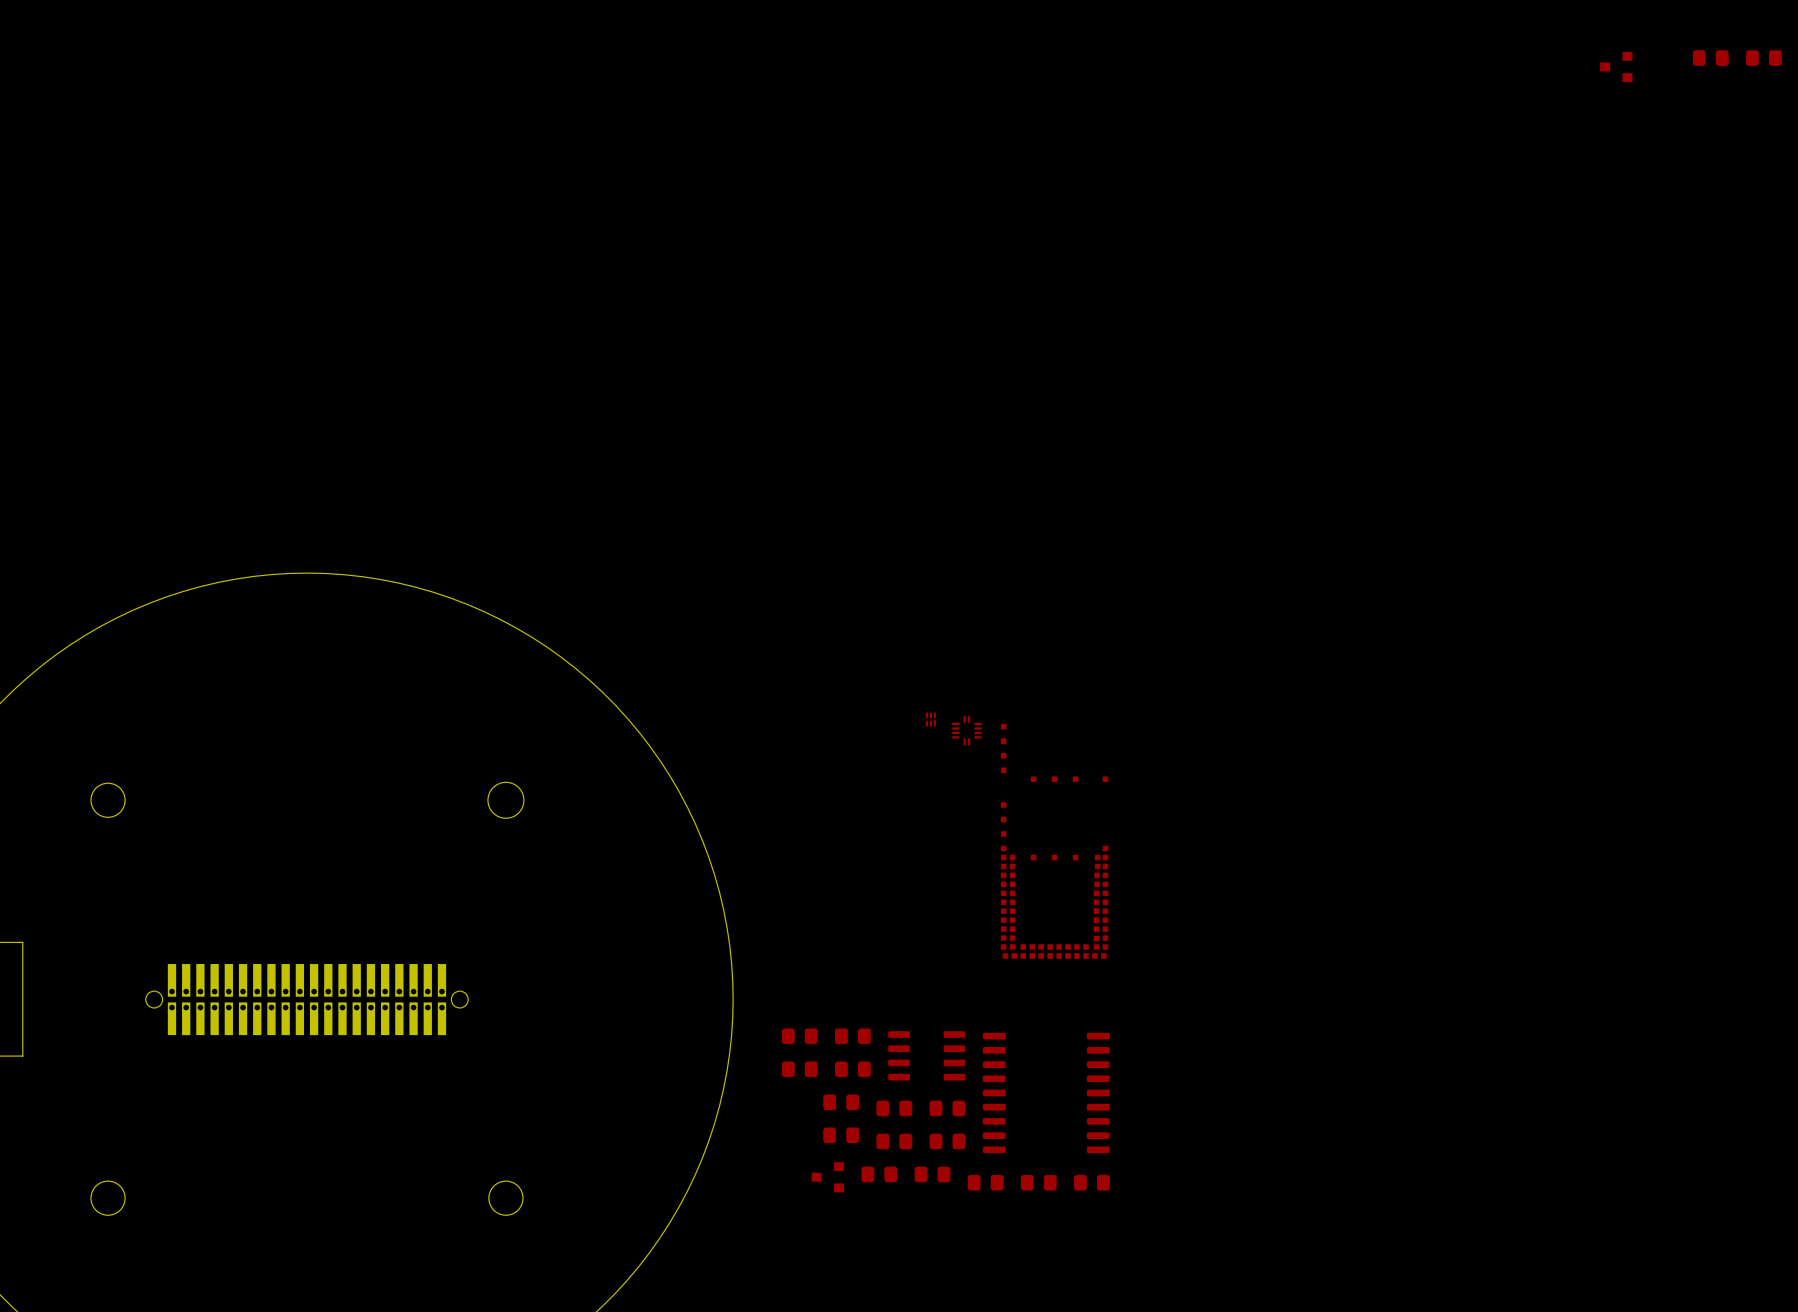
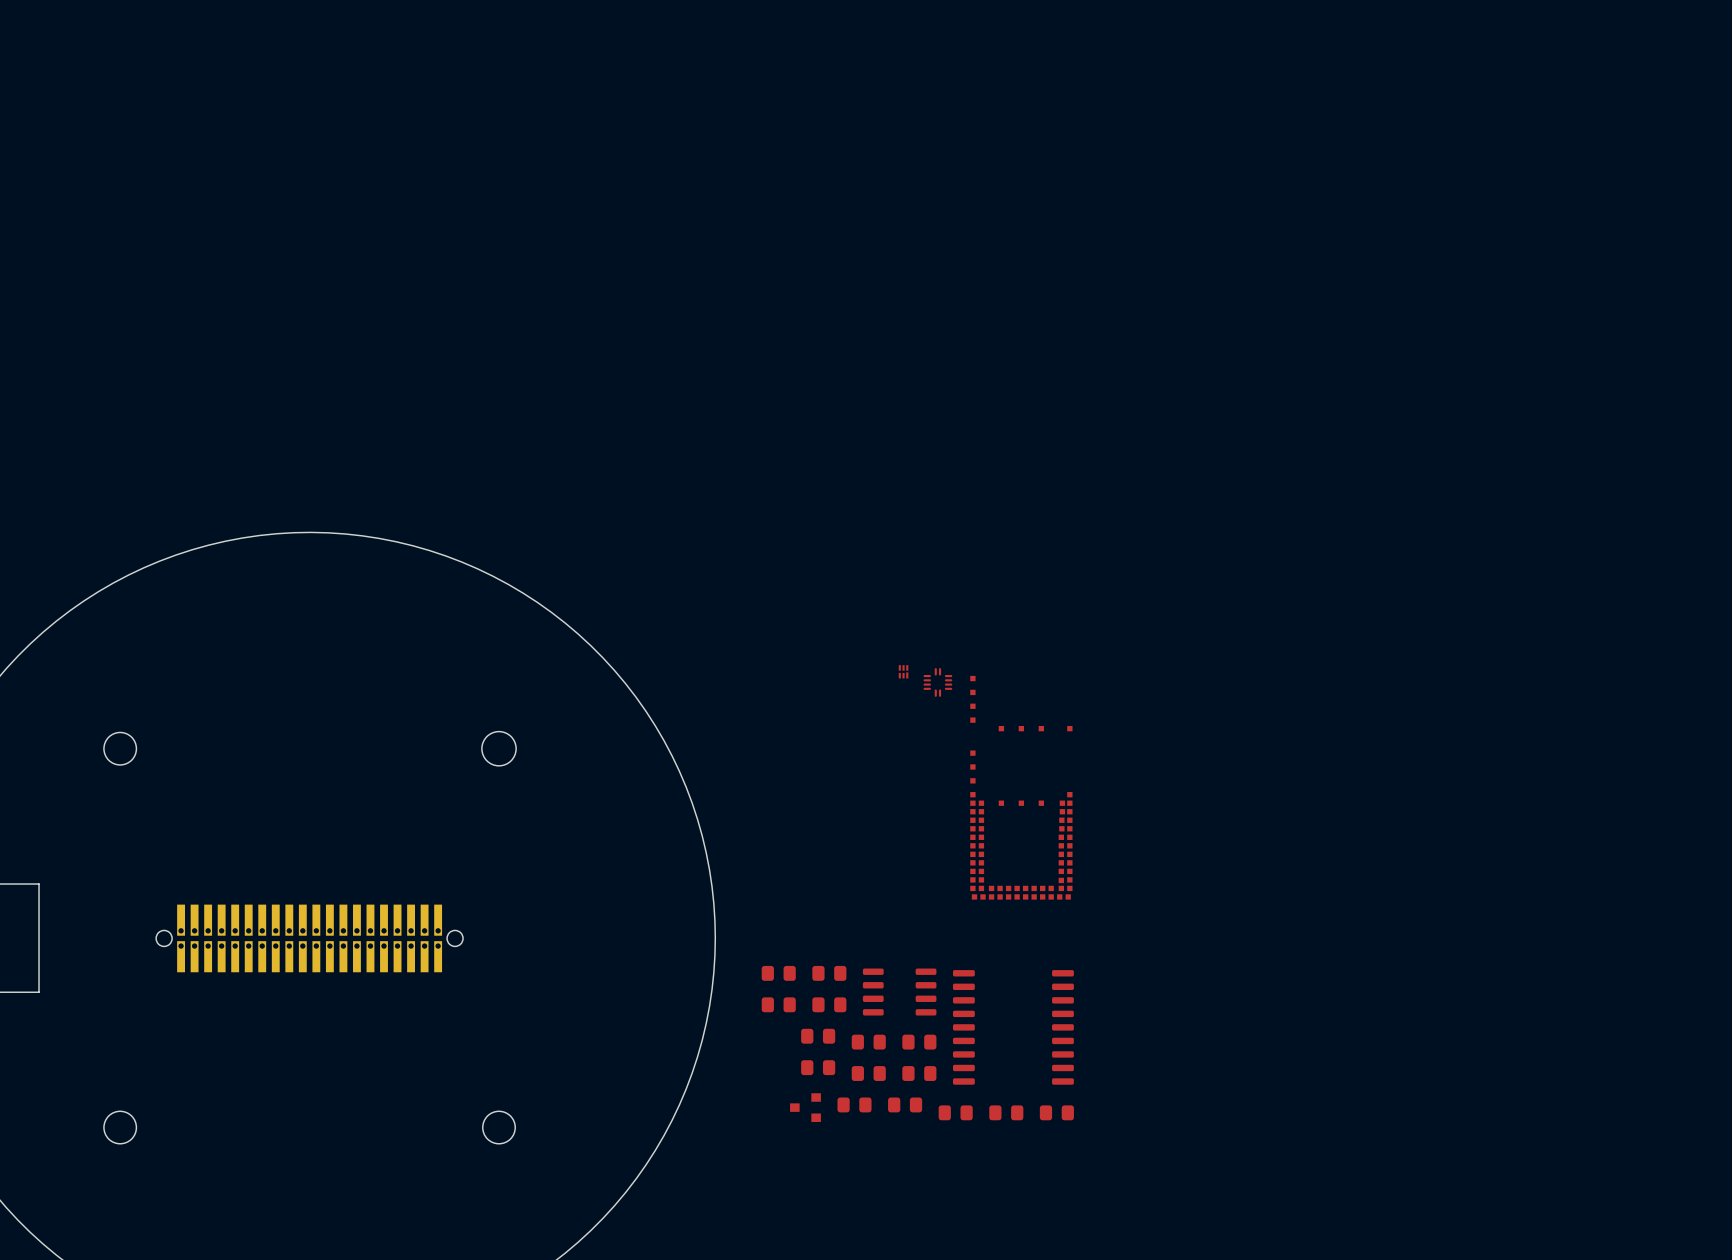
part: (1710, 58) -> none
part: (1763, 58) -> none
part: (1616, 66) -> none

